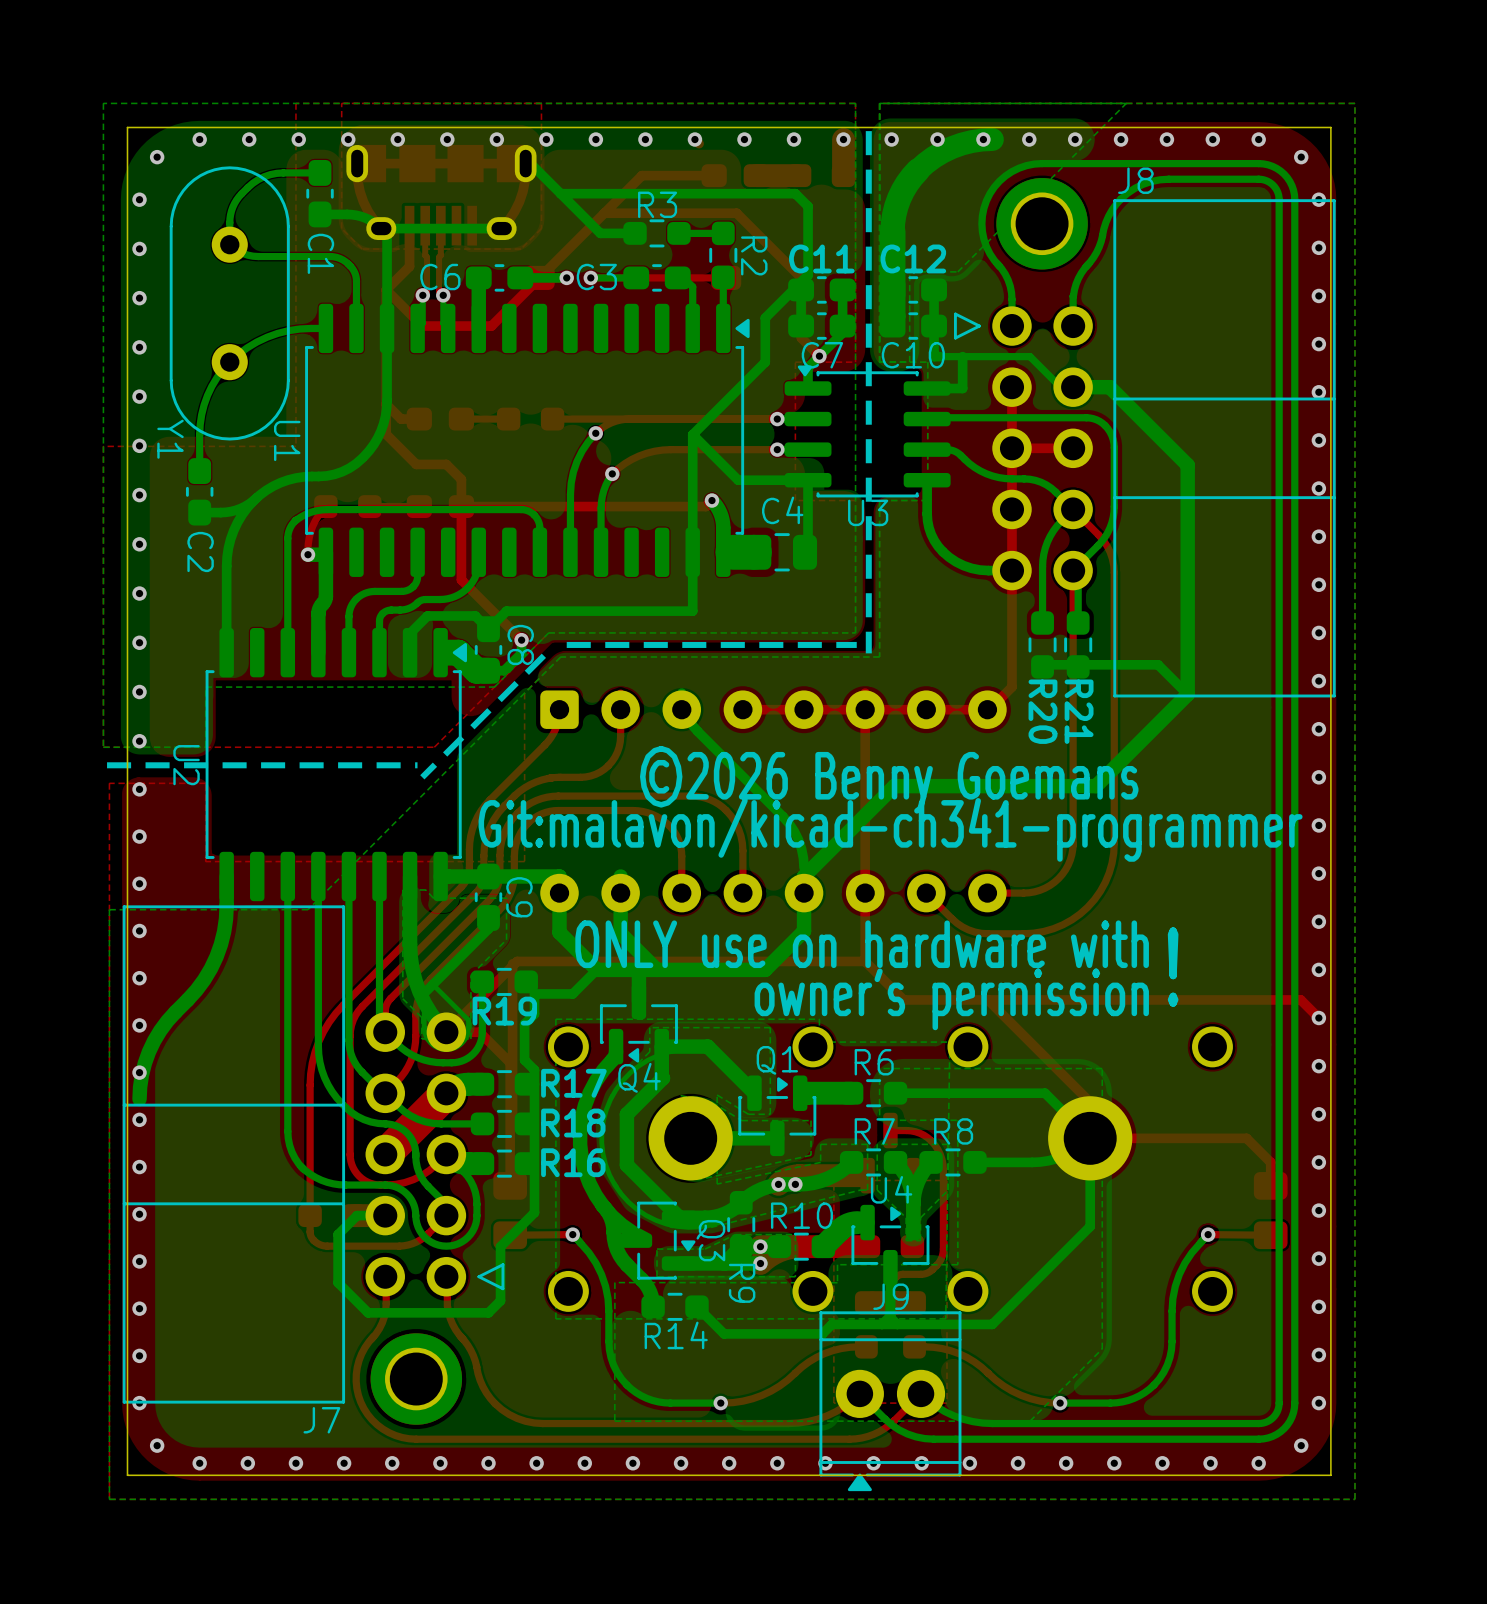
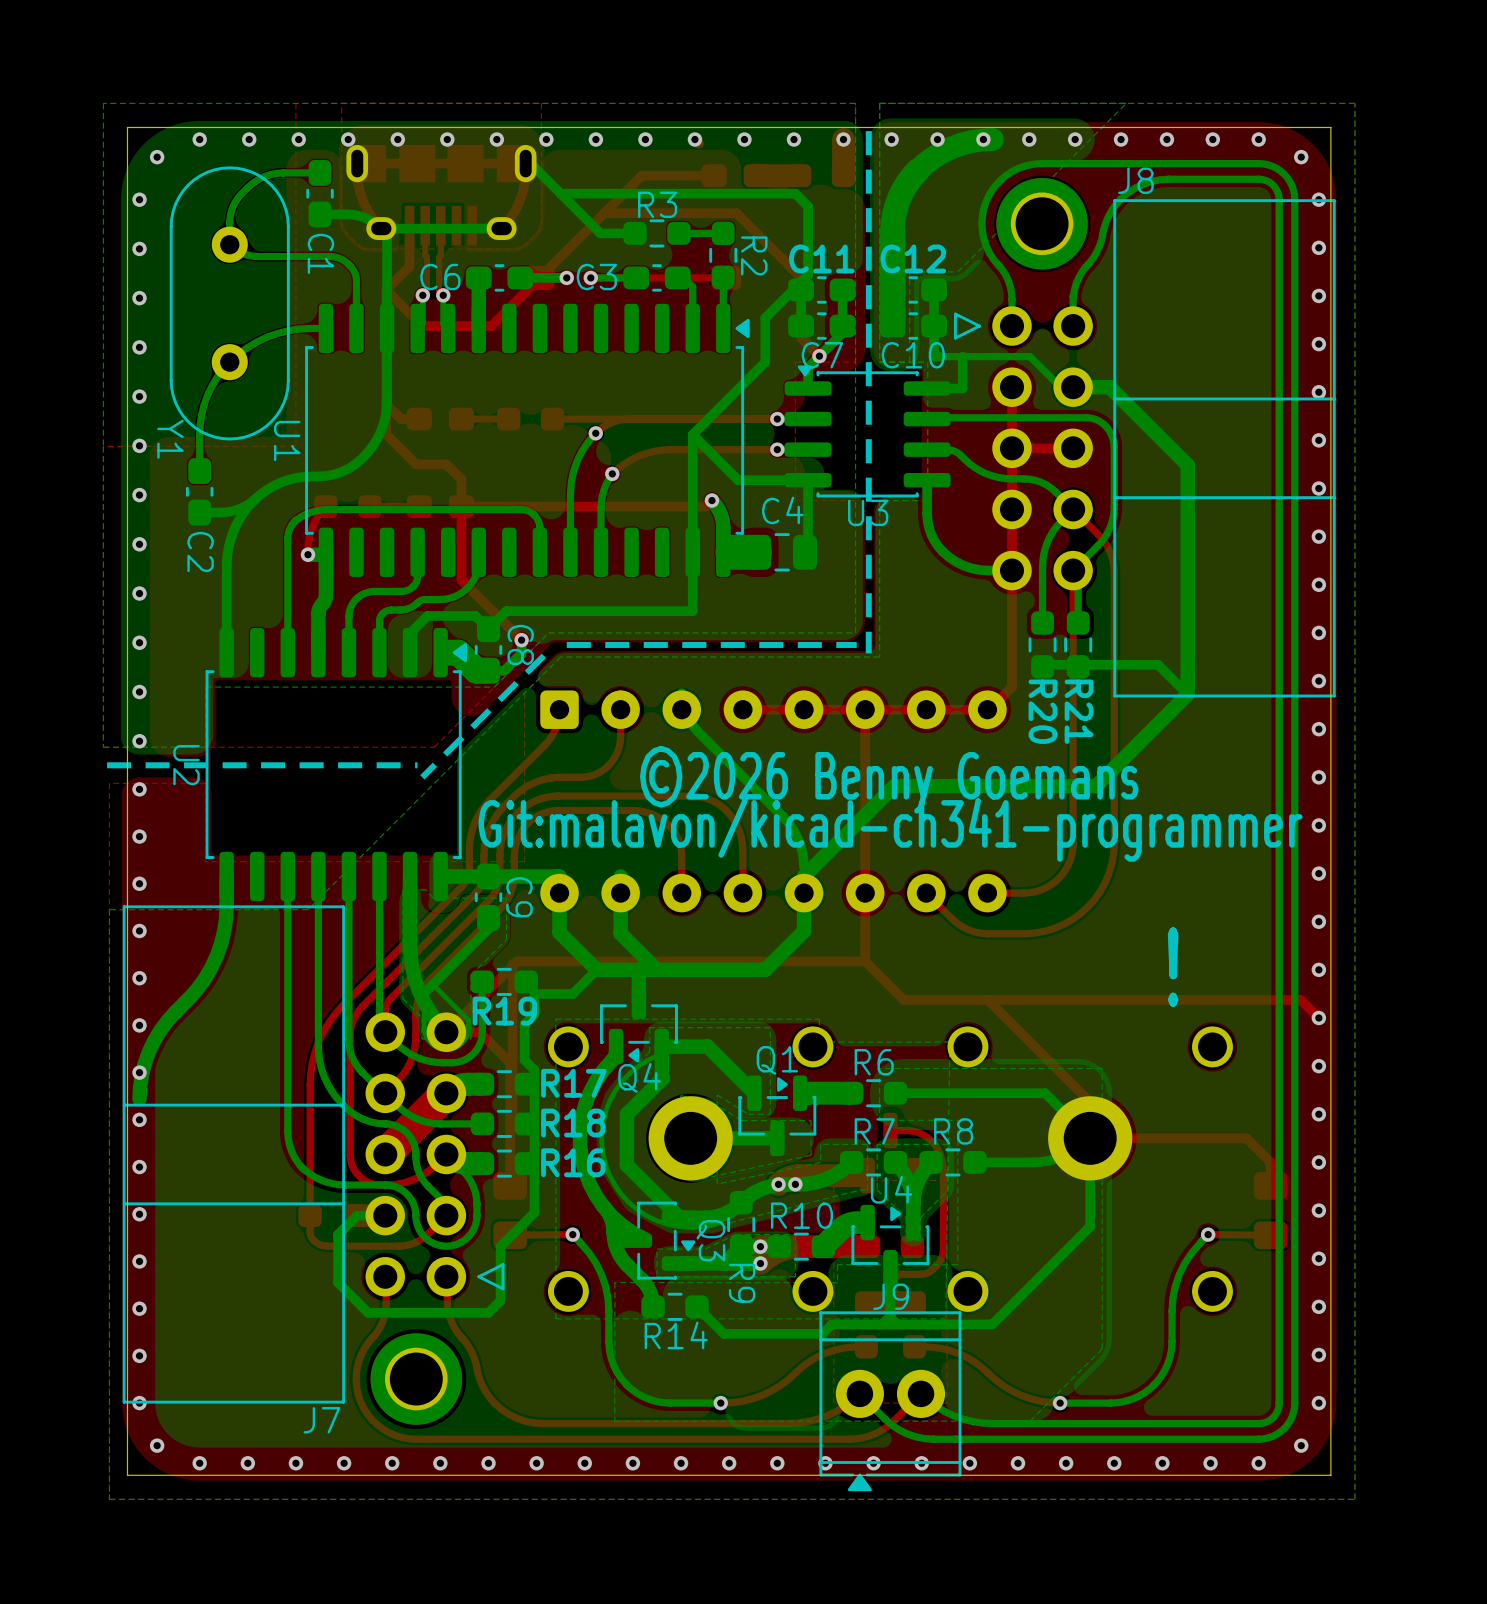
text: ONLY use on hardware with (862, 944) -> none
text: owner's permission (951, 999) -> none

